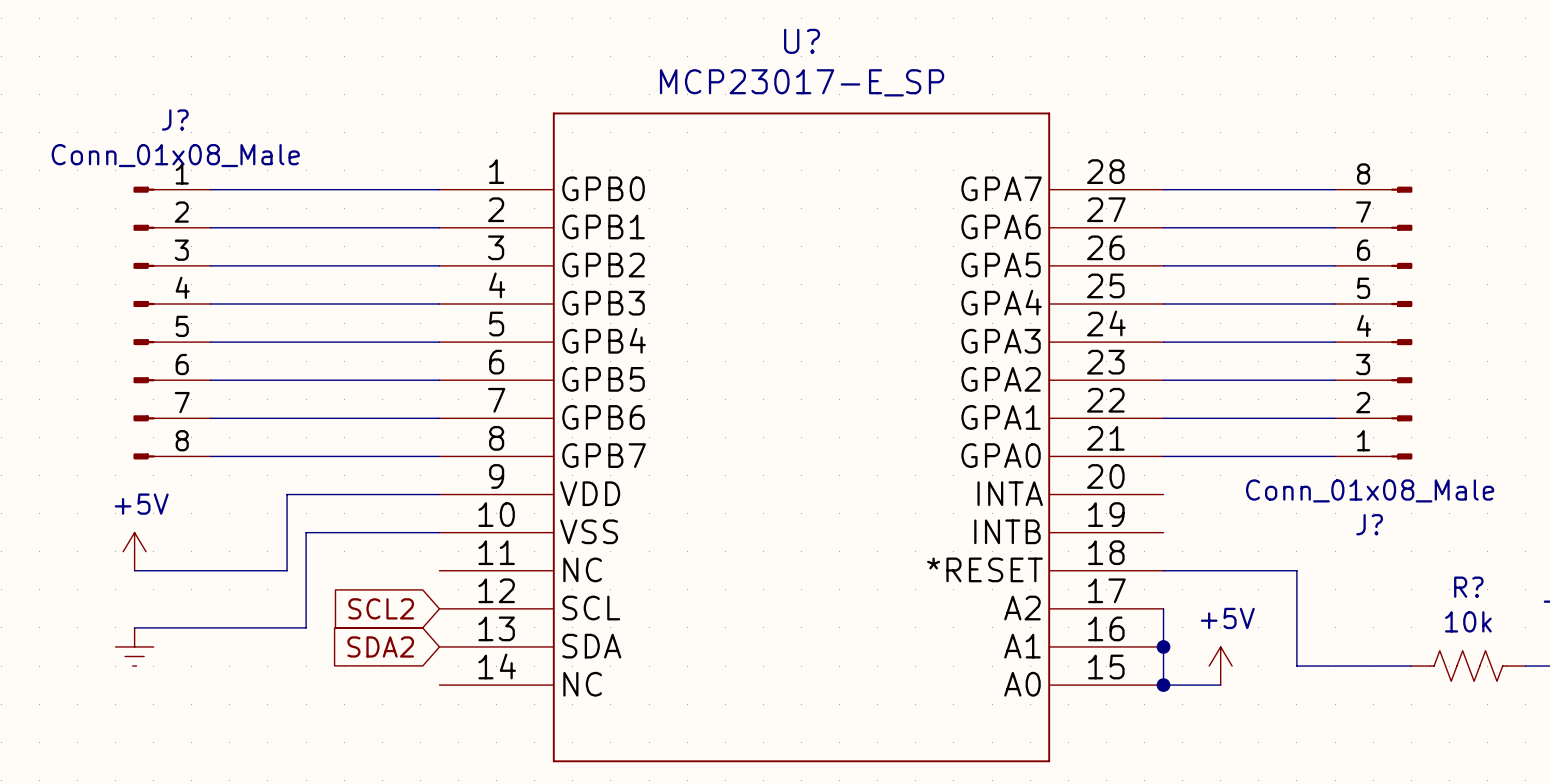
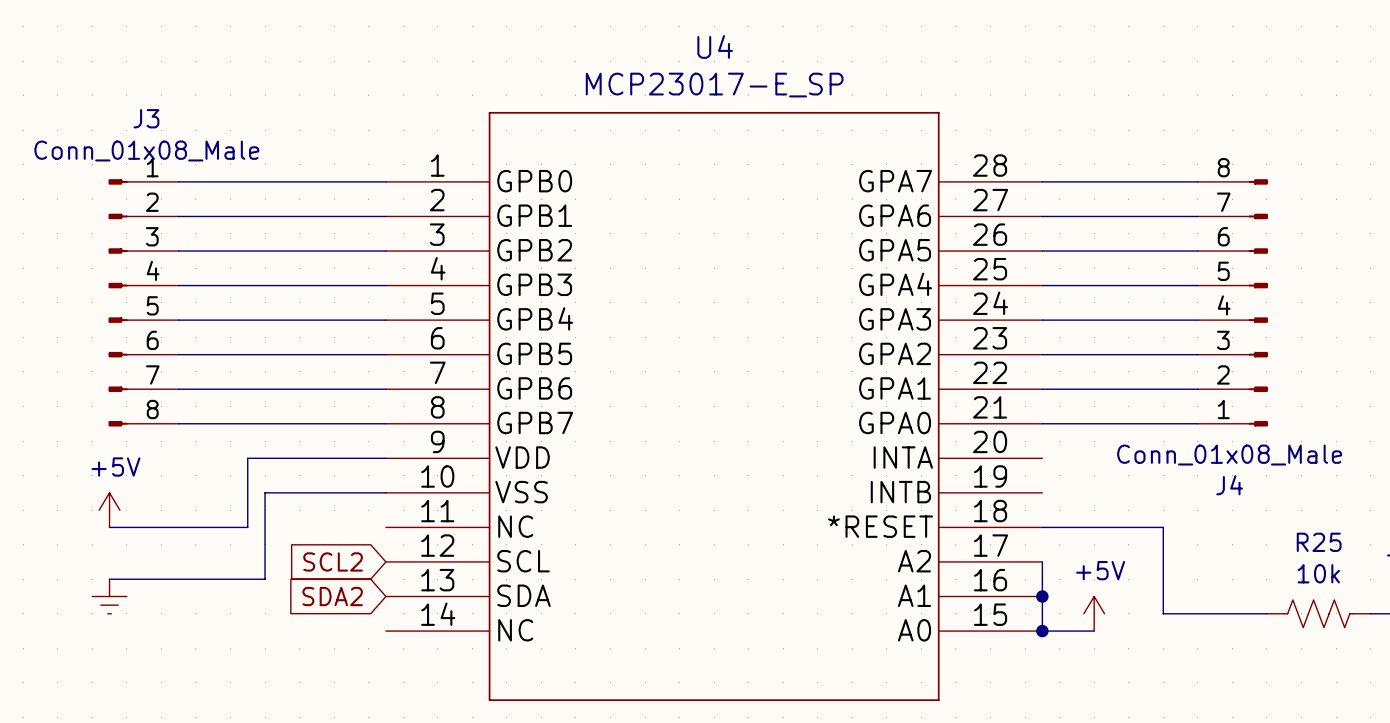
U? name: U? (802, 41) -> U4 (715, 46)
J? name: J? (175, 119) -> J3 (146, 118)
J? name: J? (1369, 524) -> J4 (1229, 485)
R? name: R? (1468, 587) -> R25 (1319, 542)

